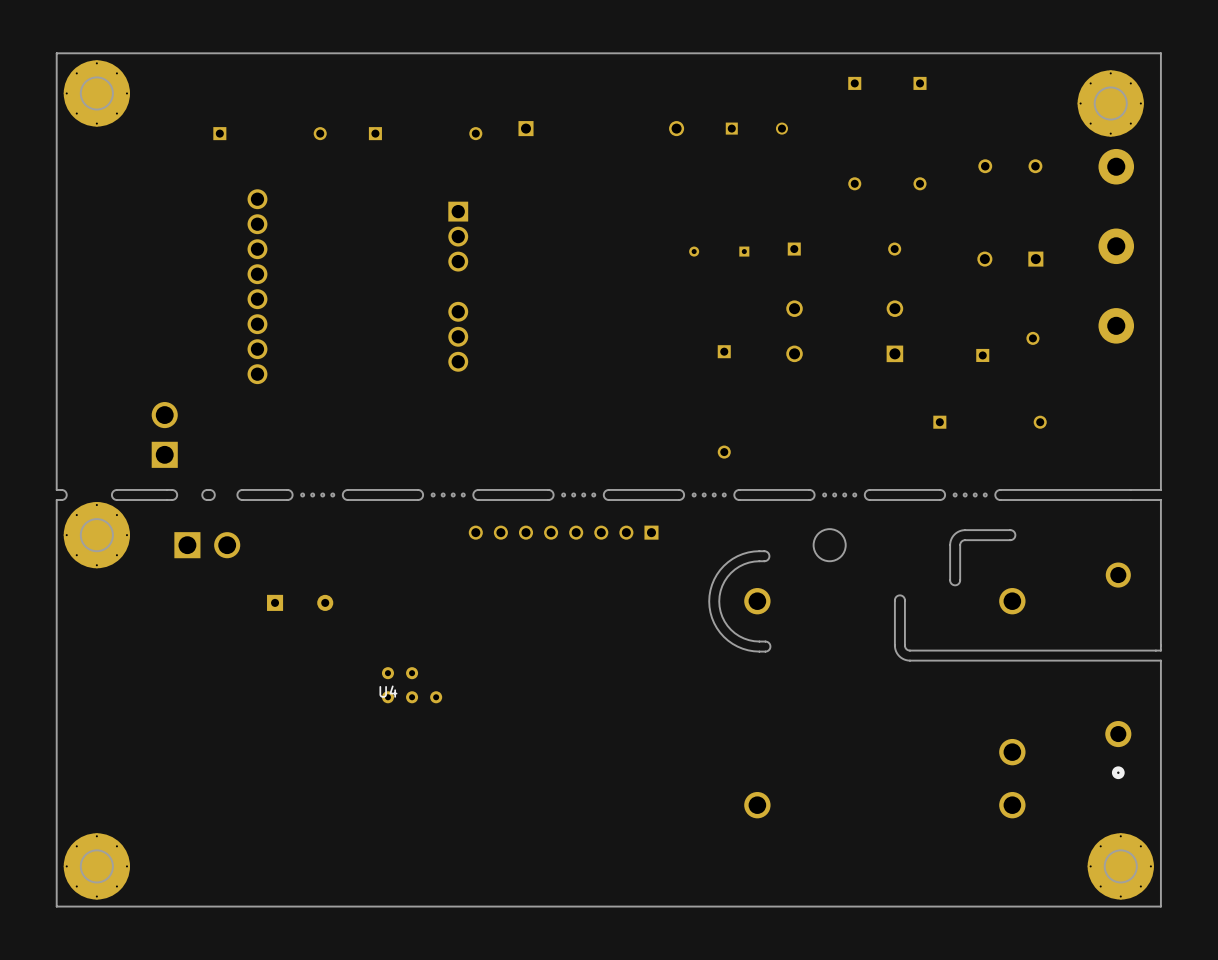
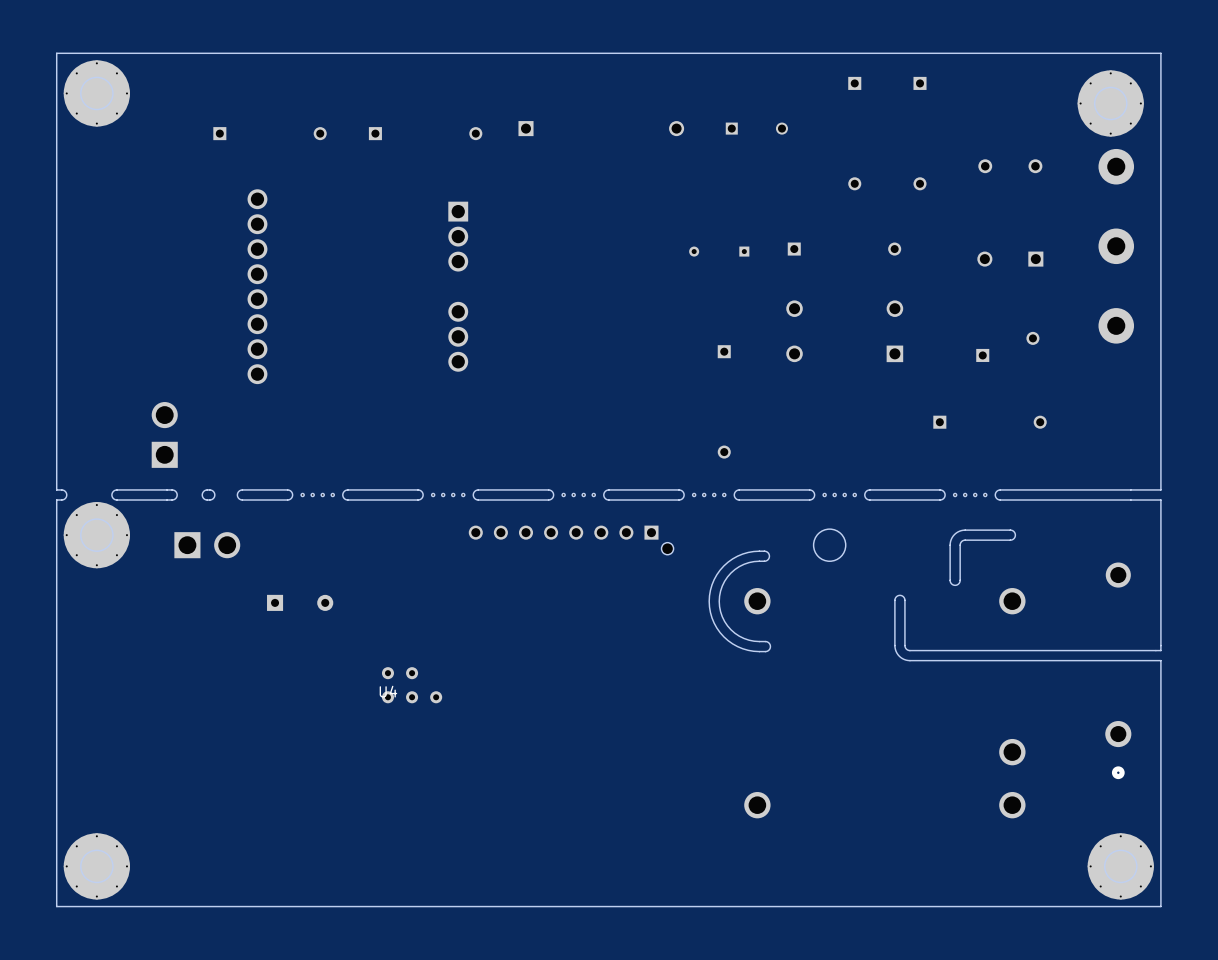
part: none -> (571, 540)

